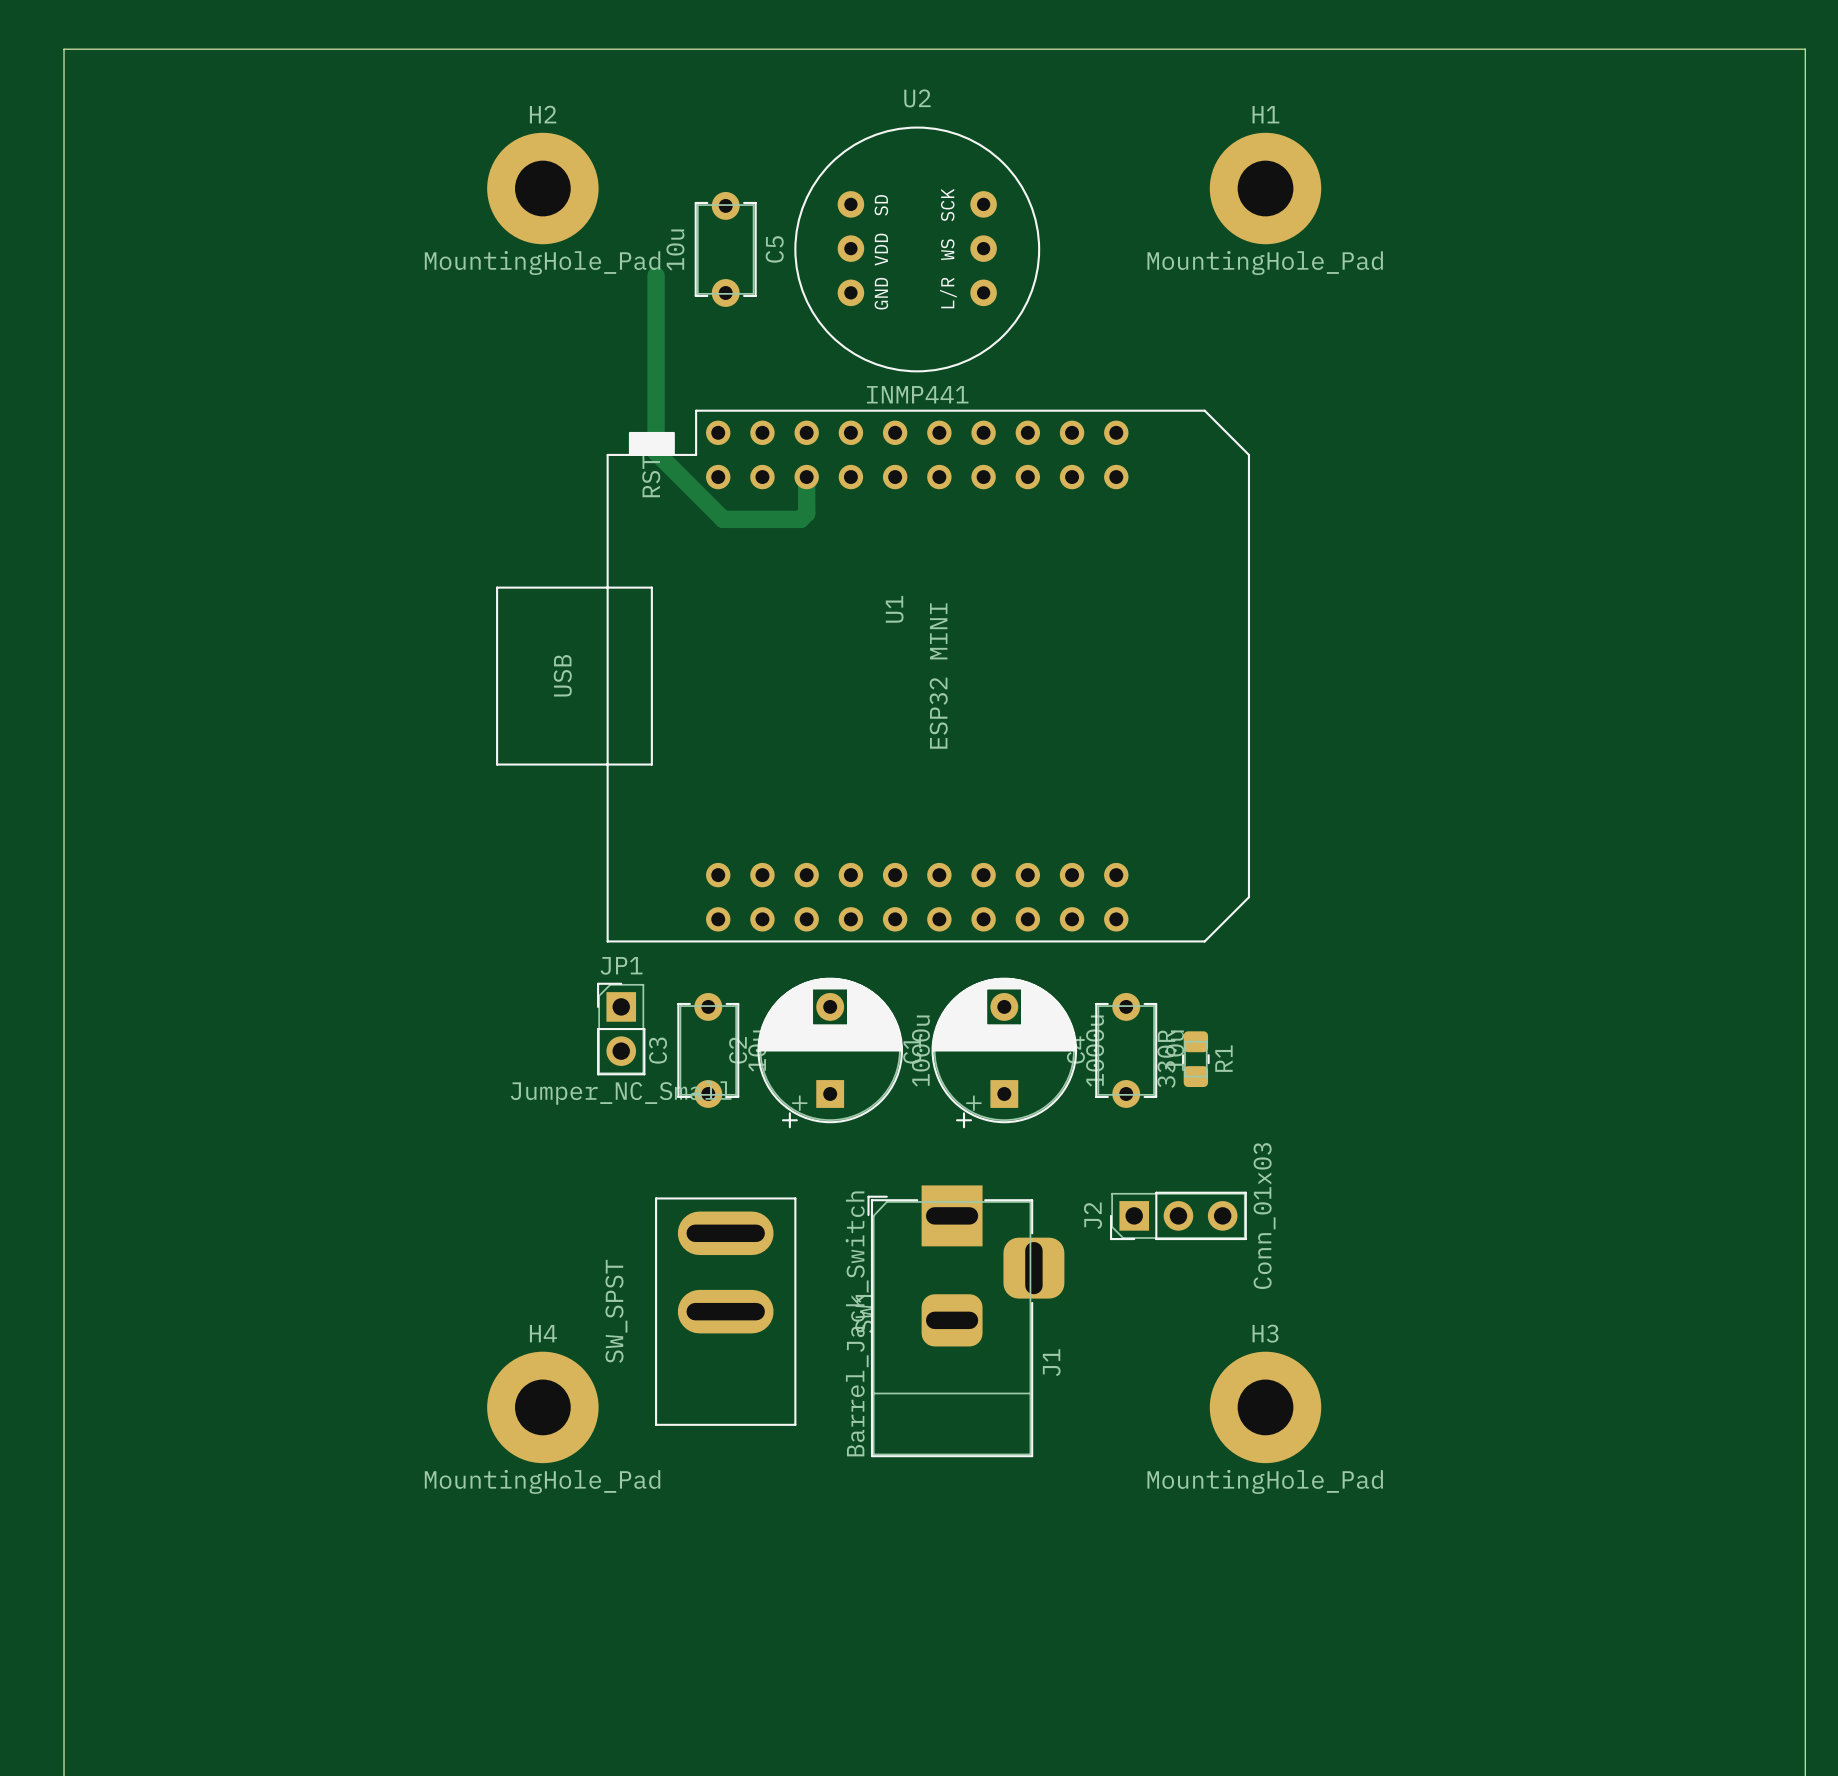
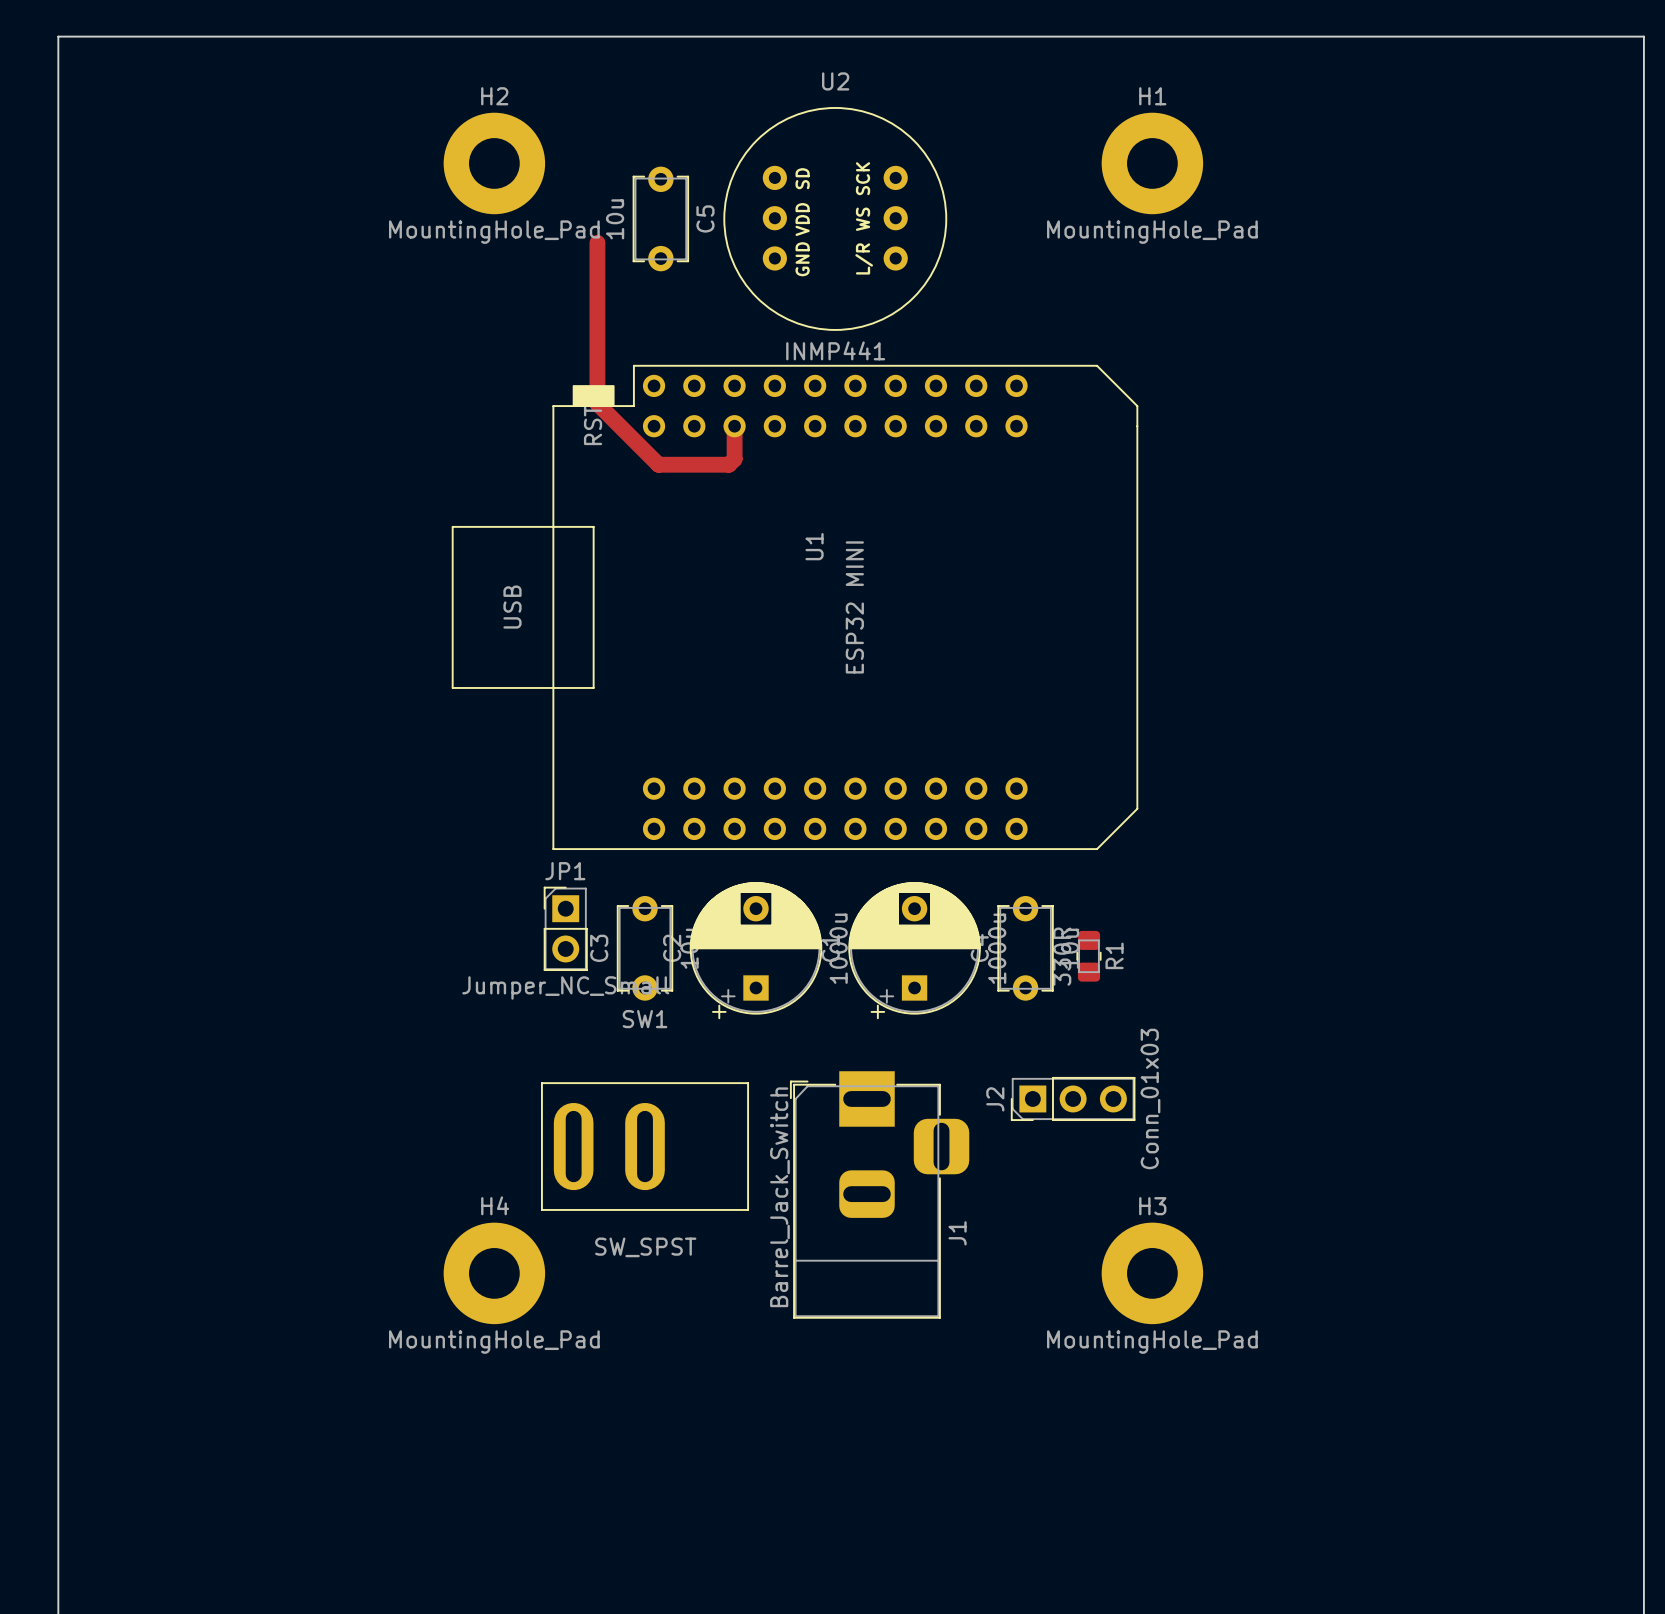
SW1 rotation: 0° (725, 1311) -> 90° counterclockwise (645, 1146)

